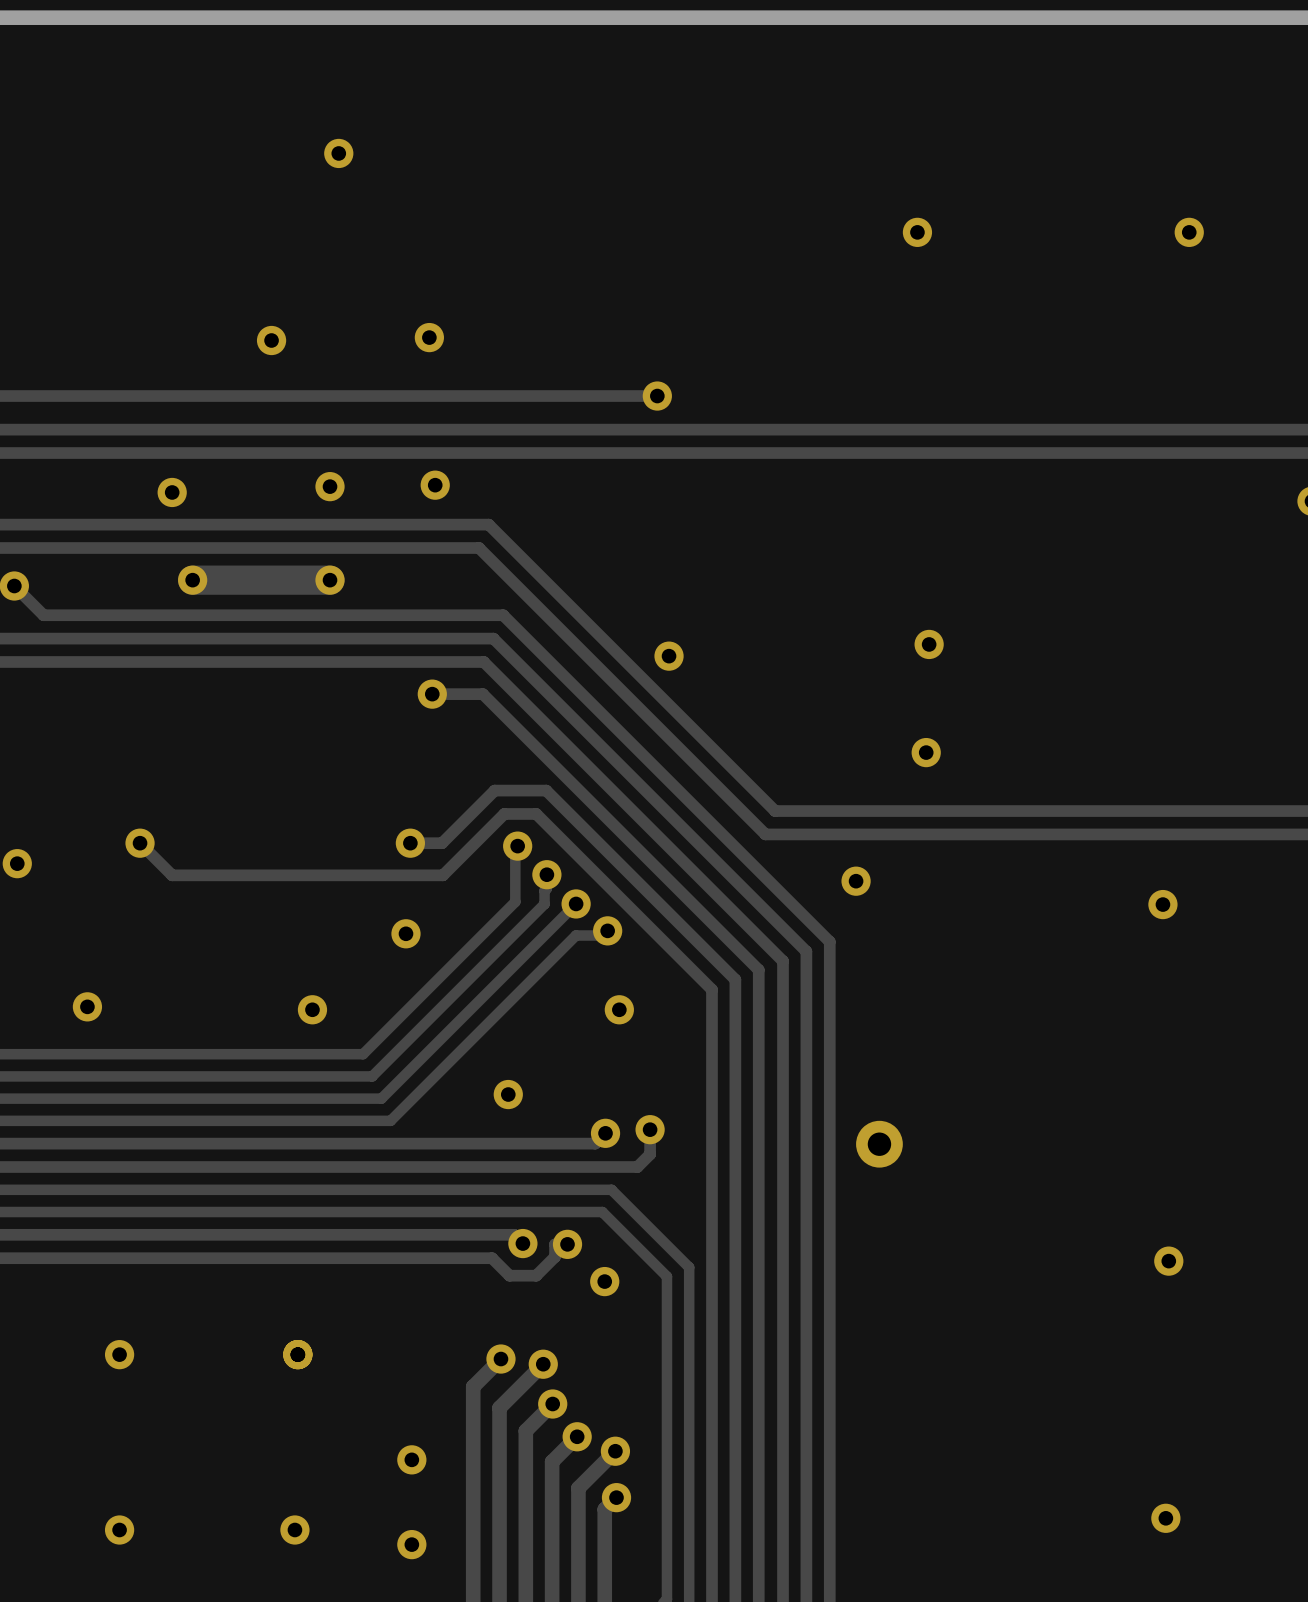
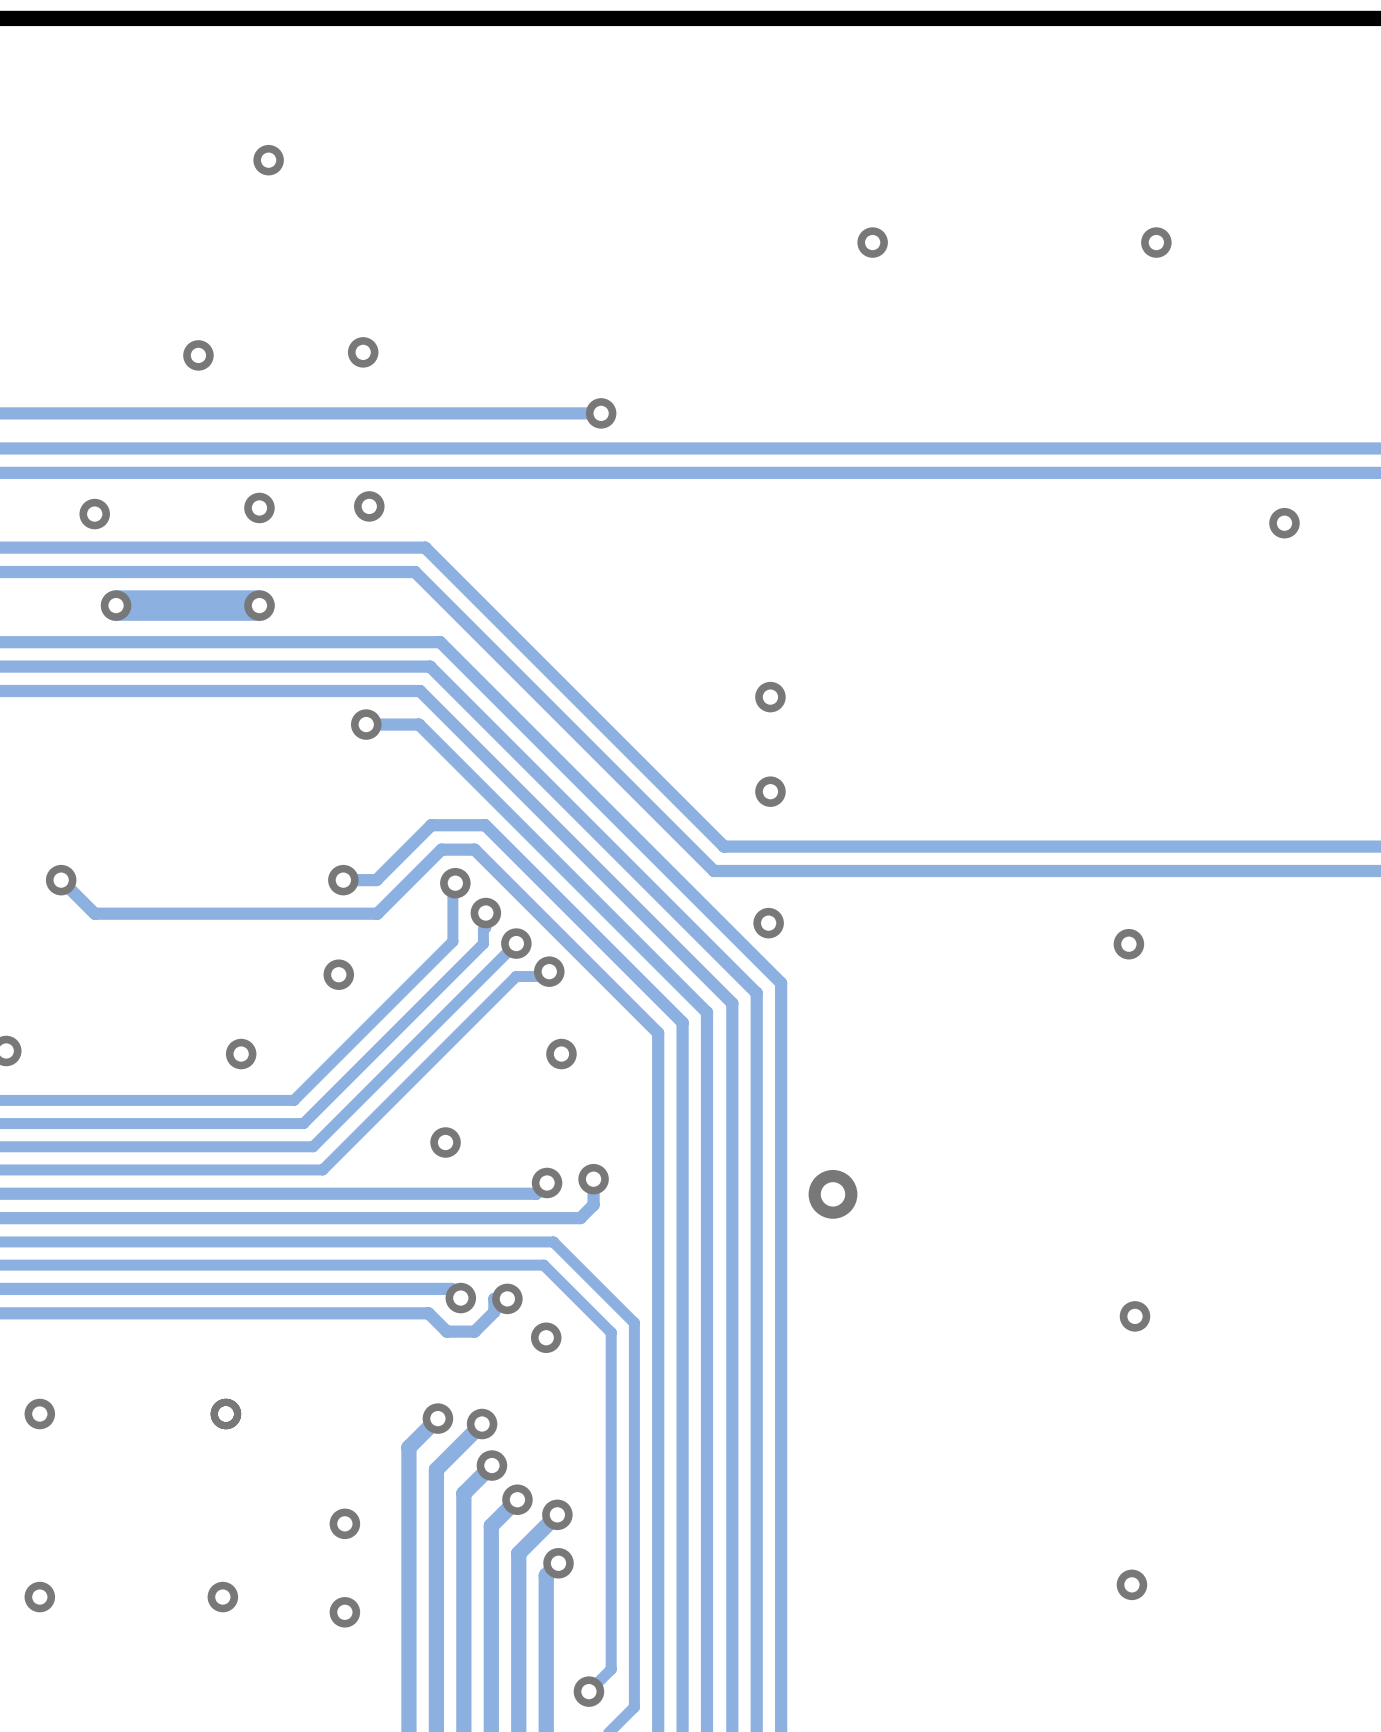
via: (929, 644) -> none
via: (669, 656) -> none
via: none -> (770, 697)
via: (926, 752) -> none
via: none -> (770, 791)
via position: (856, 881) -> (768, 923)

